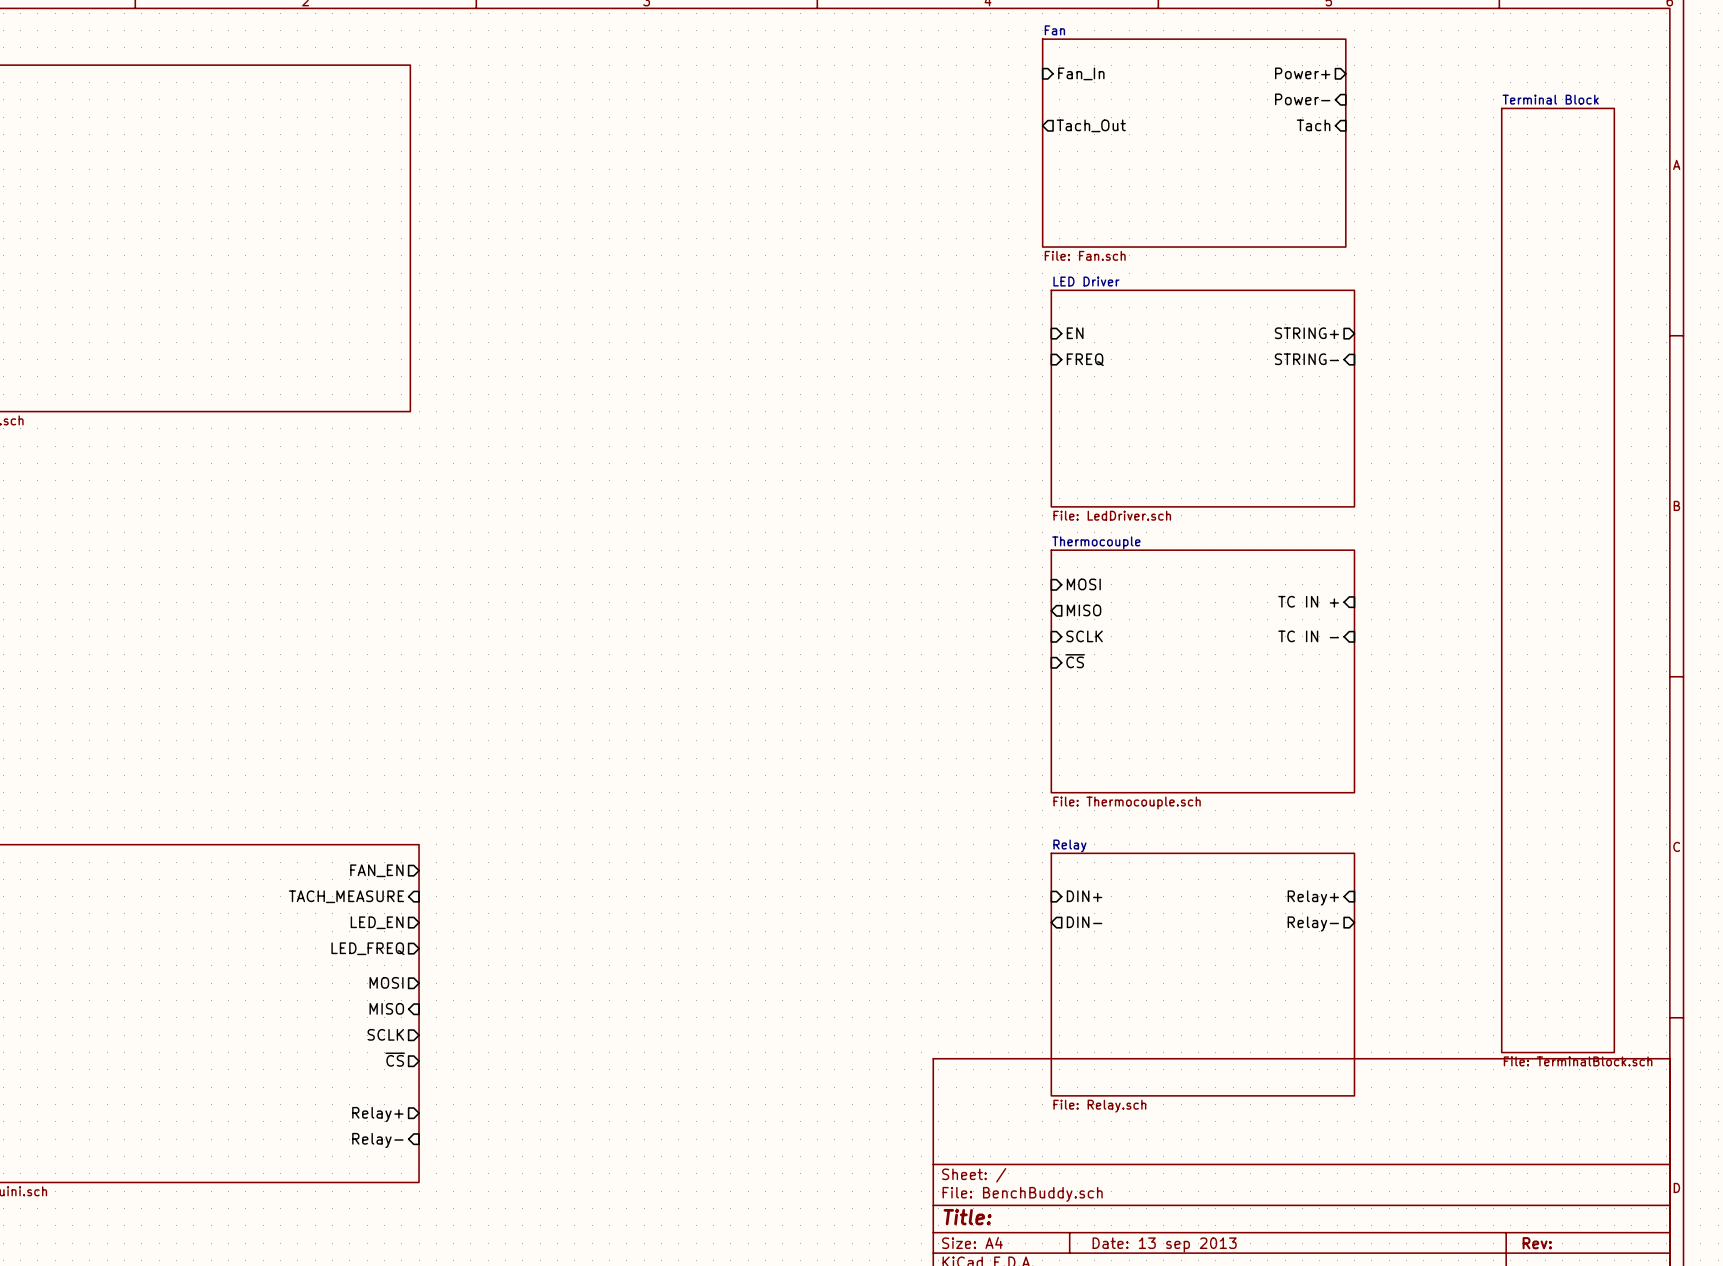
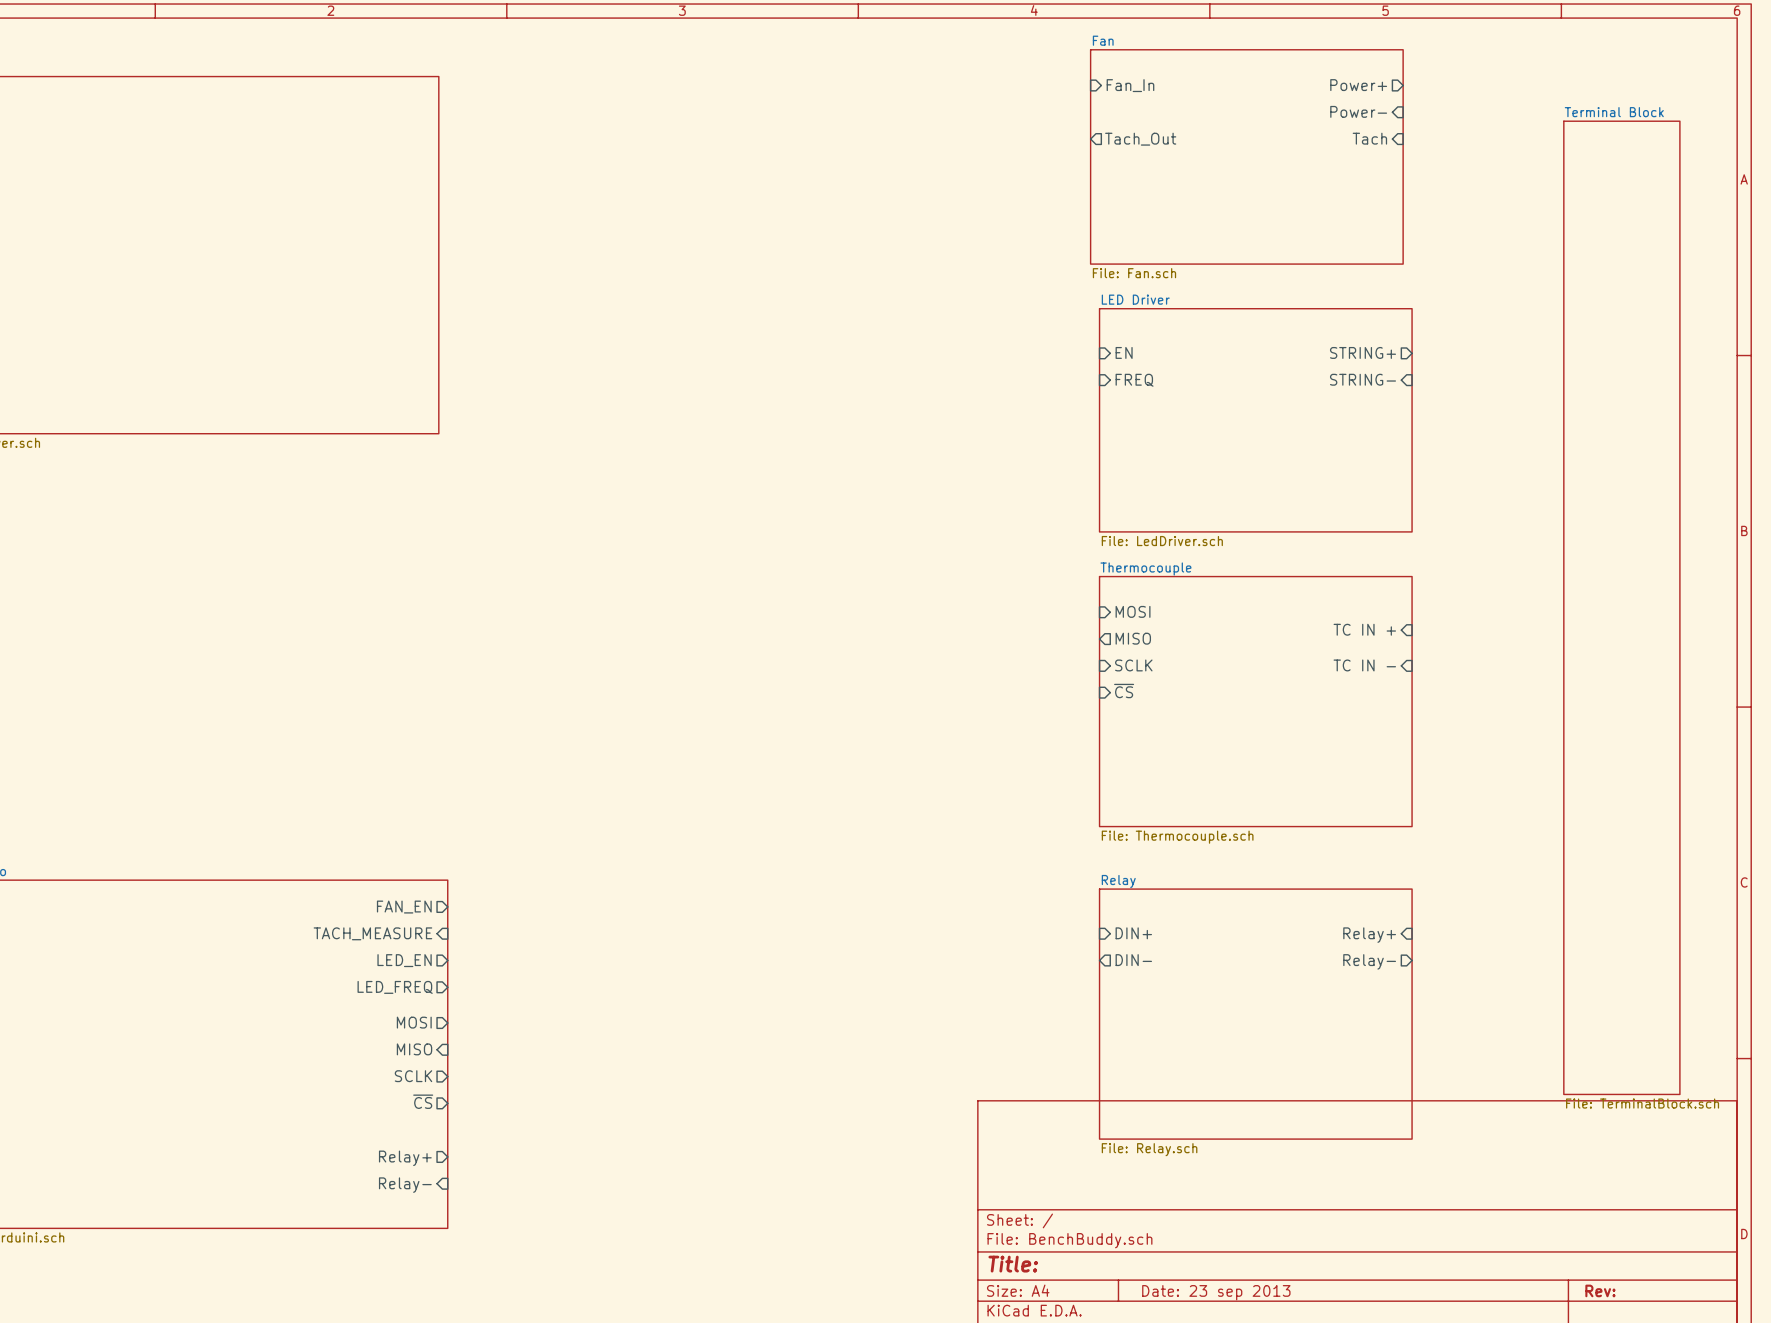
title block: Date: 13 sep 2013 (1164, 1244) -> Date: 23 sep 2013 (1216, 1292)

